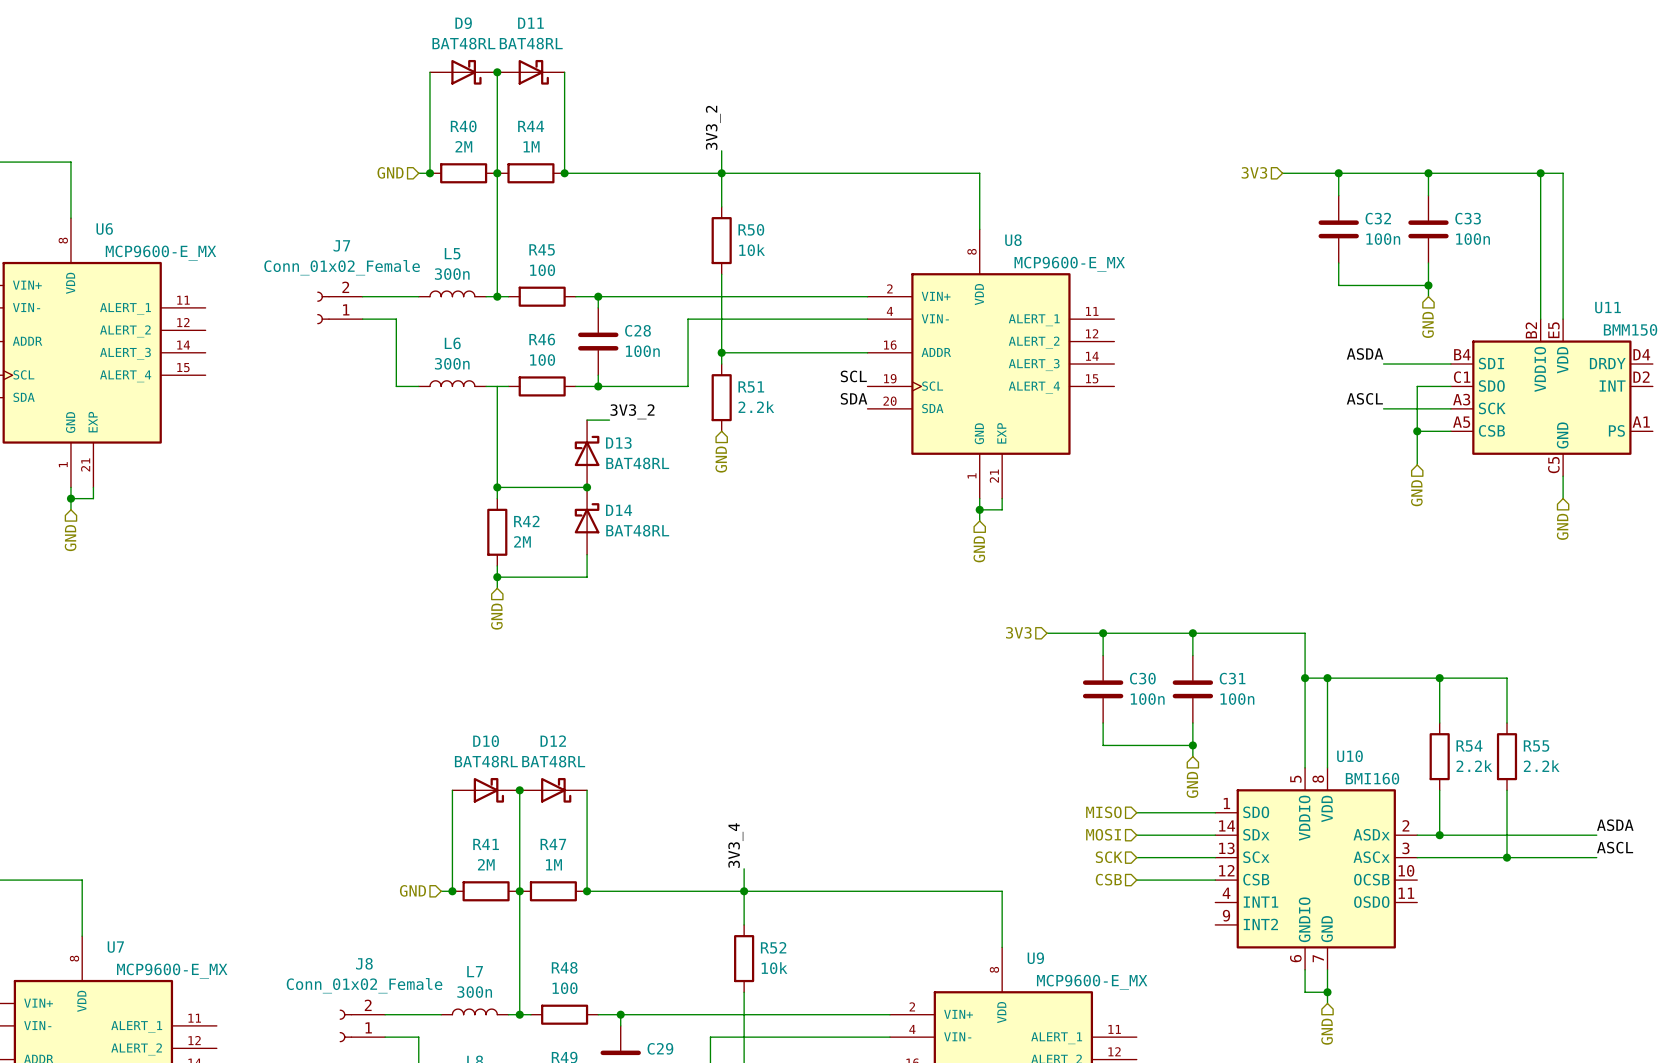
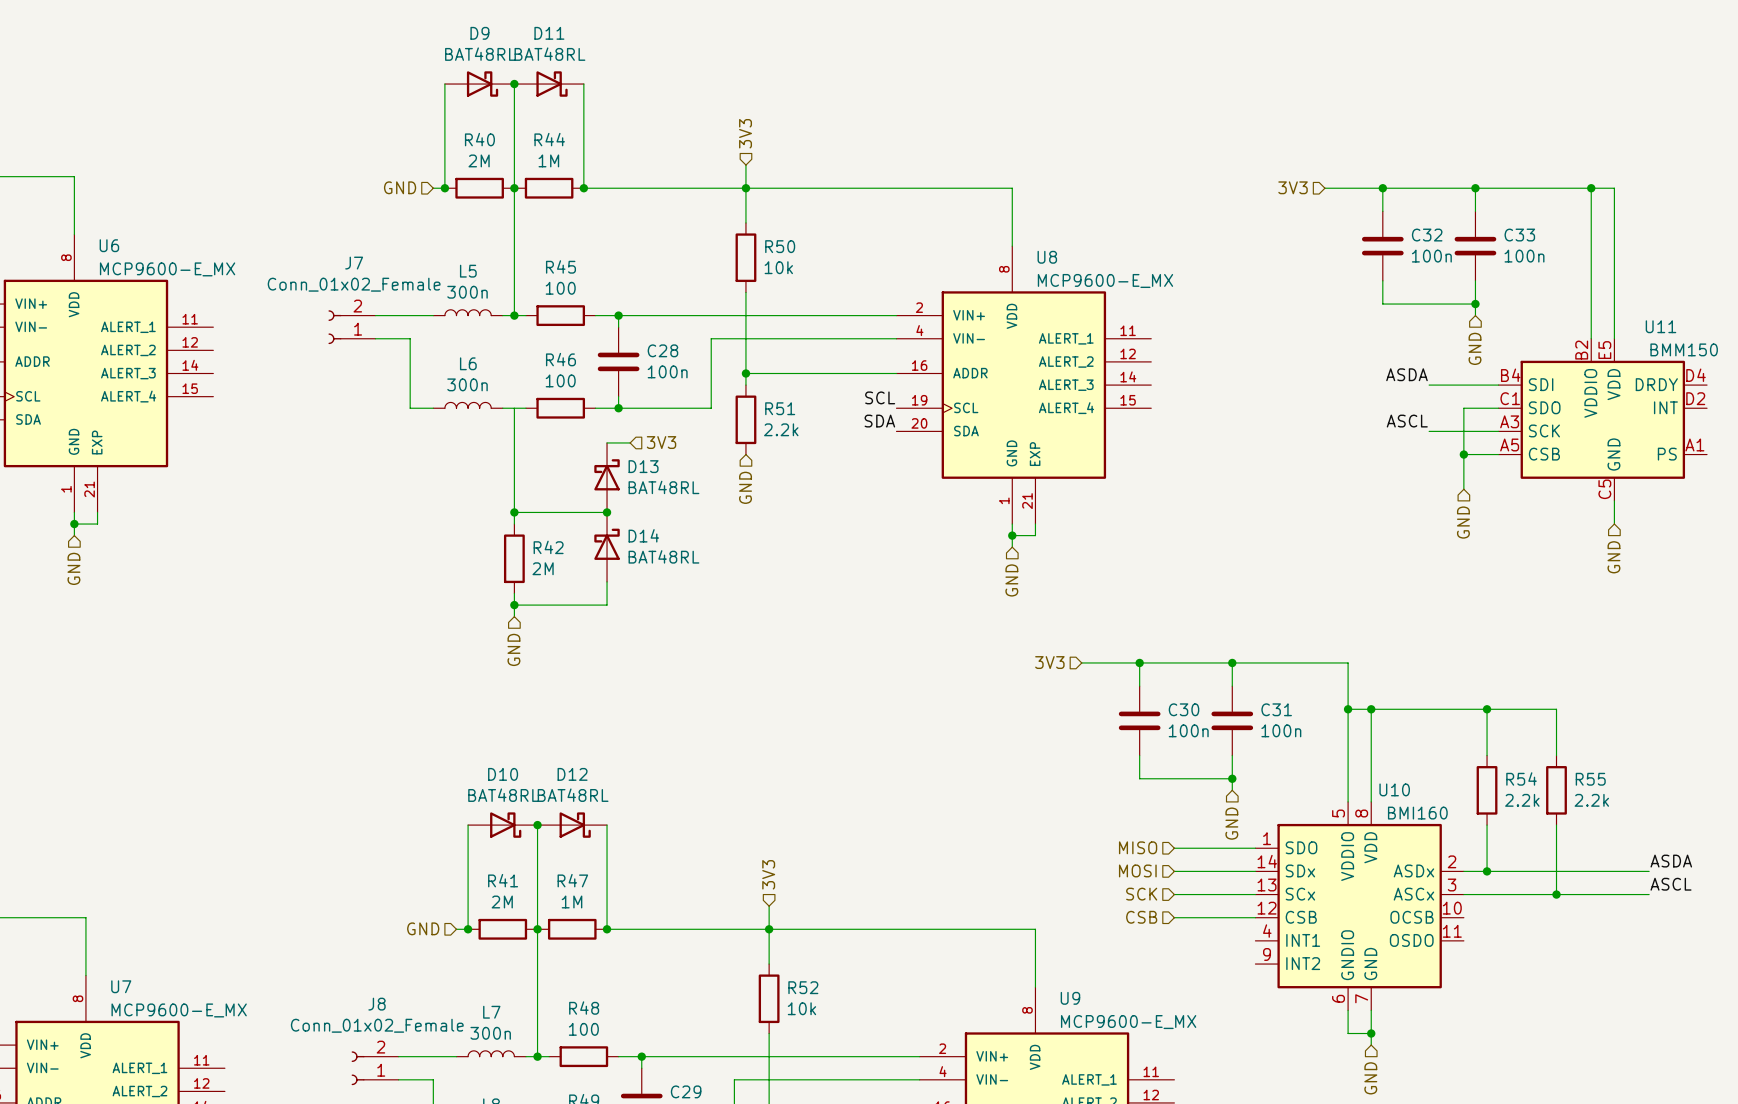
hierarchical label: none -> 3V3 (745, 133)
label: 3V3_2 (713, 127) -> none
label: 3V3_2 (632, 411) -> none
hierarchical label: none -> 3V3 (661, 442)
hierarchical label: none -> 3V3 (768, 874)
label: 3V3_4 (735, 845) -> none

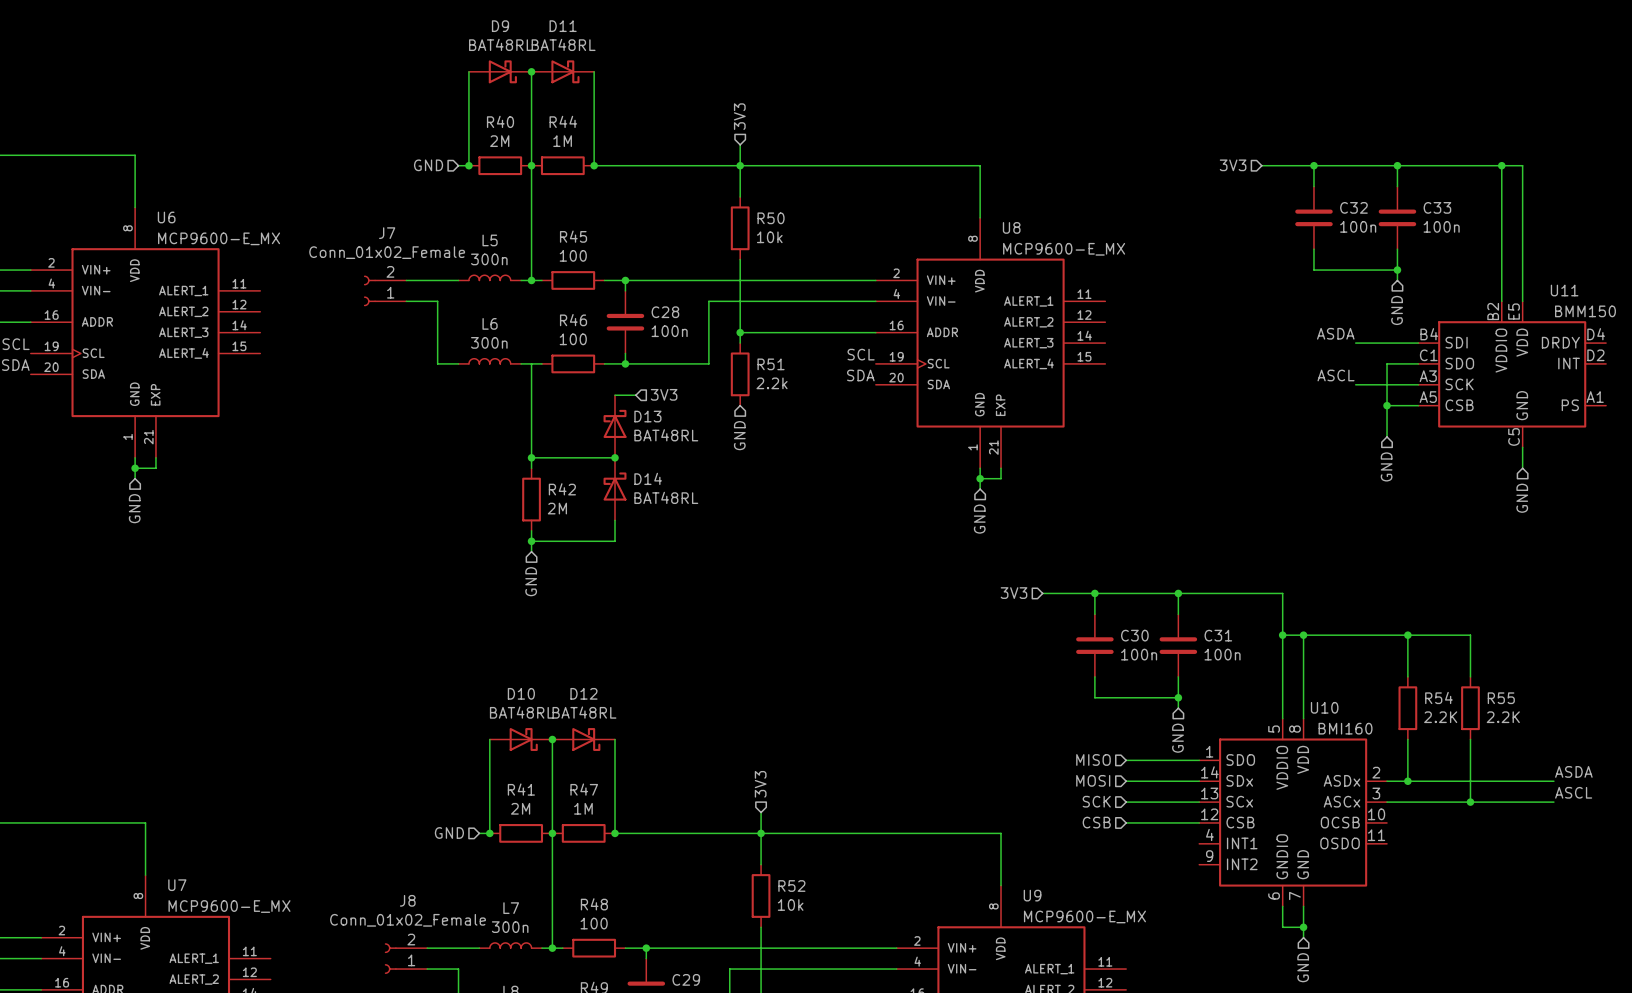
R54 value: 2.2k (1522, 800) -> 2.2K (1440, 717)
R55 value: 2.2k (1591, 800) -> 2.2K (1503, 717)

